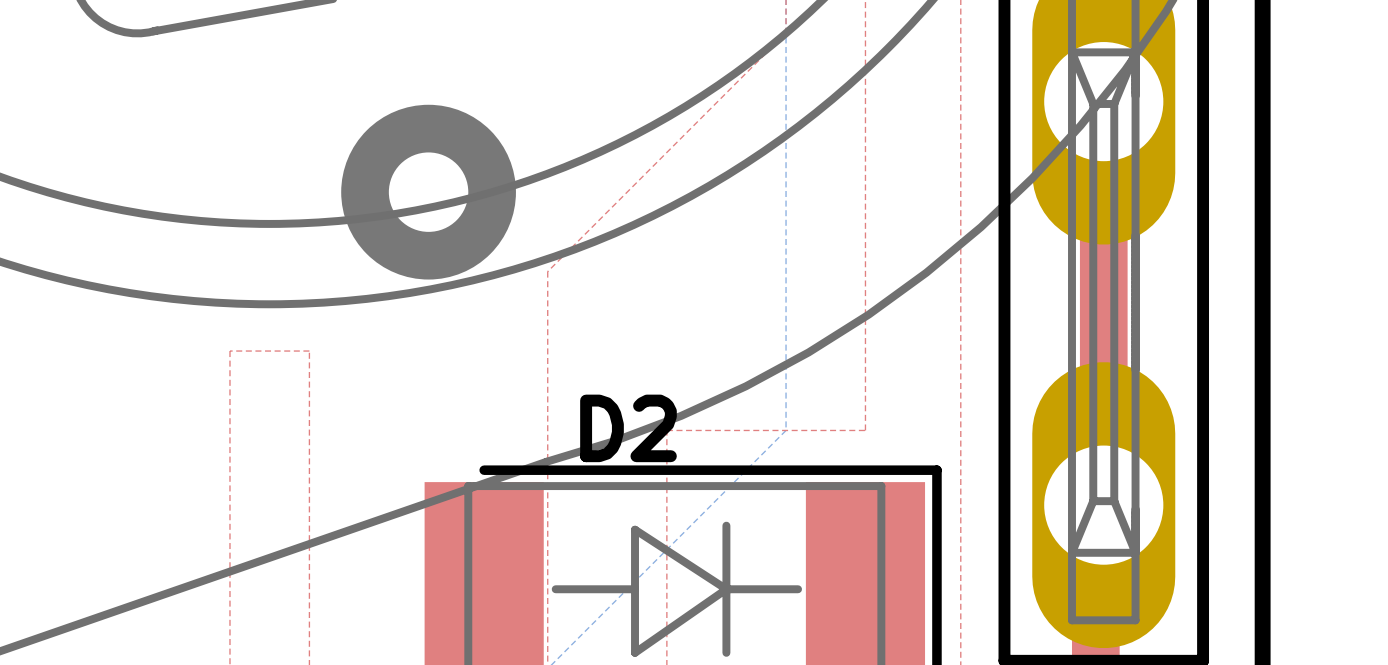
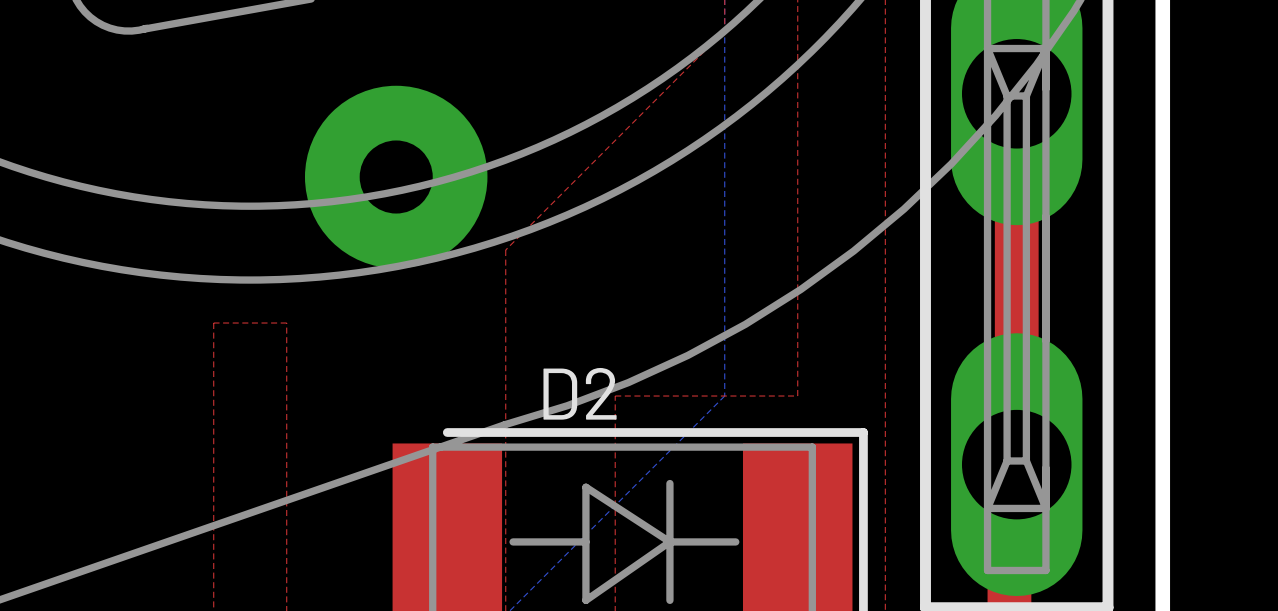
part: none -> (396, 177)
via: (428, 192) -> none

